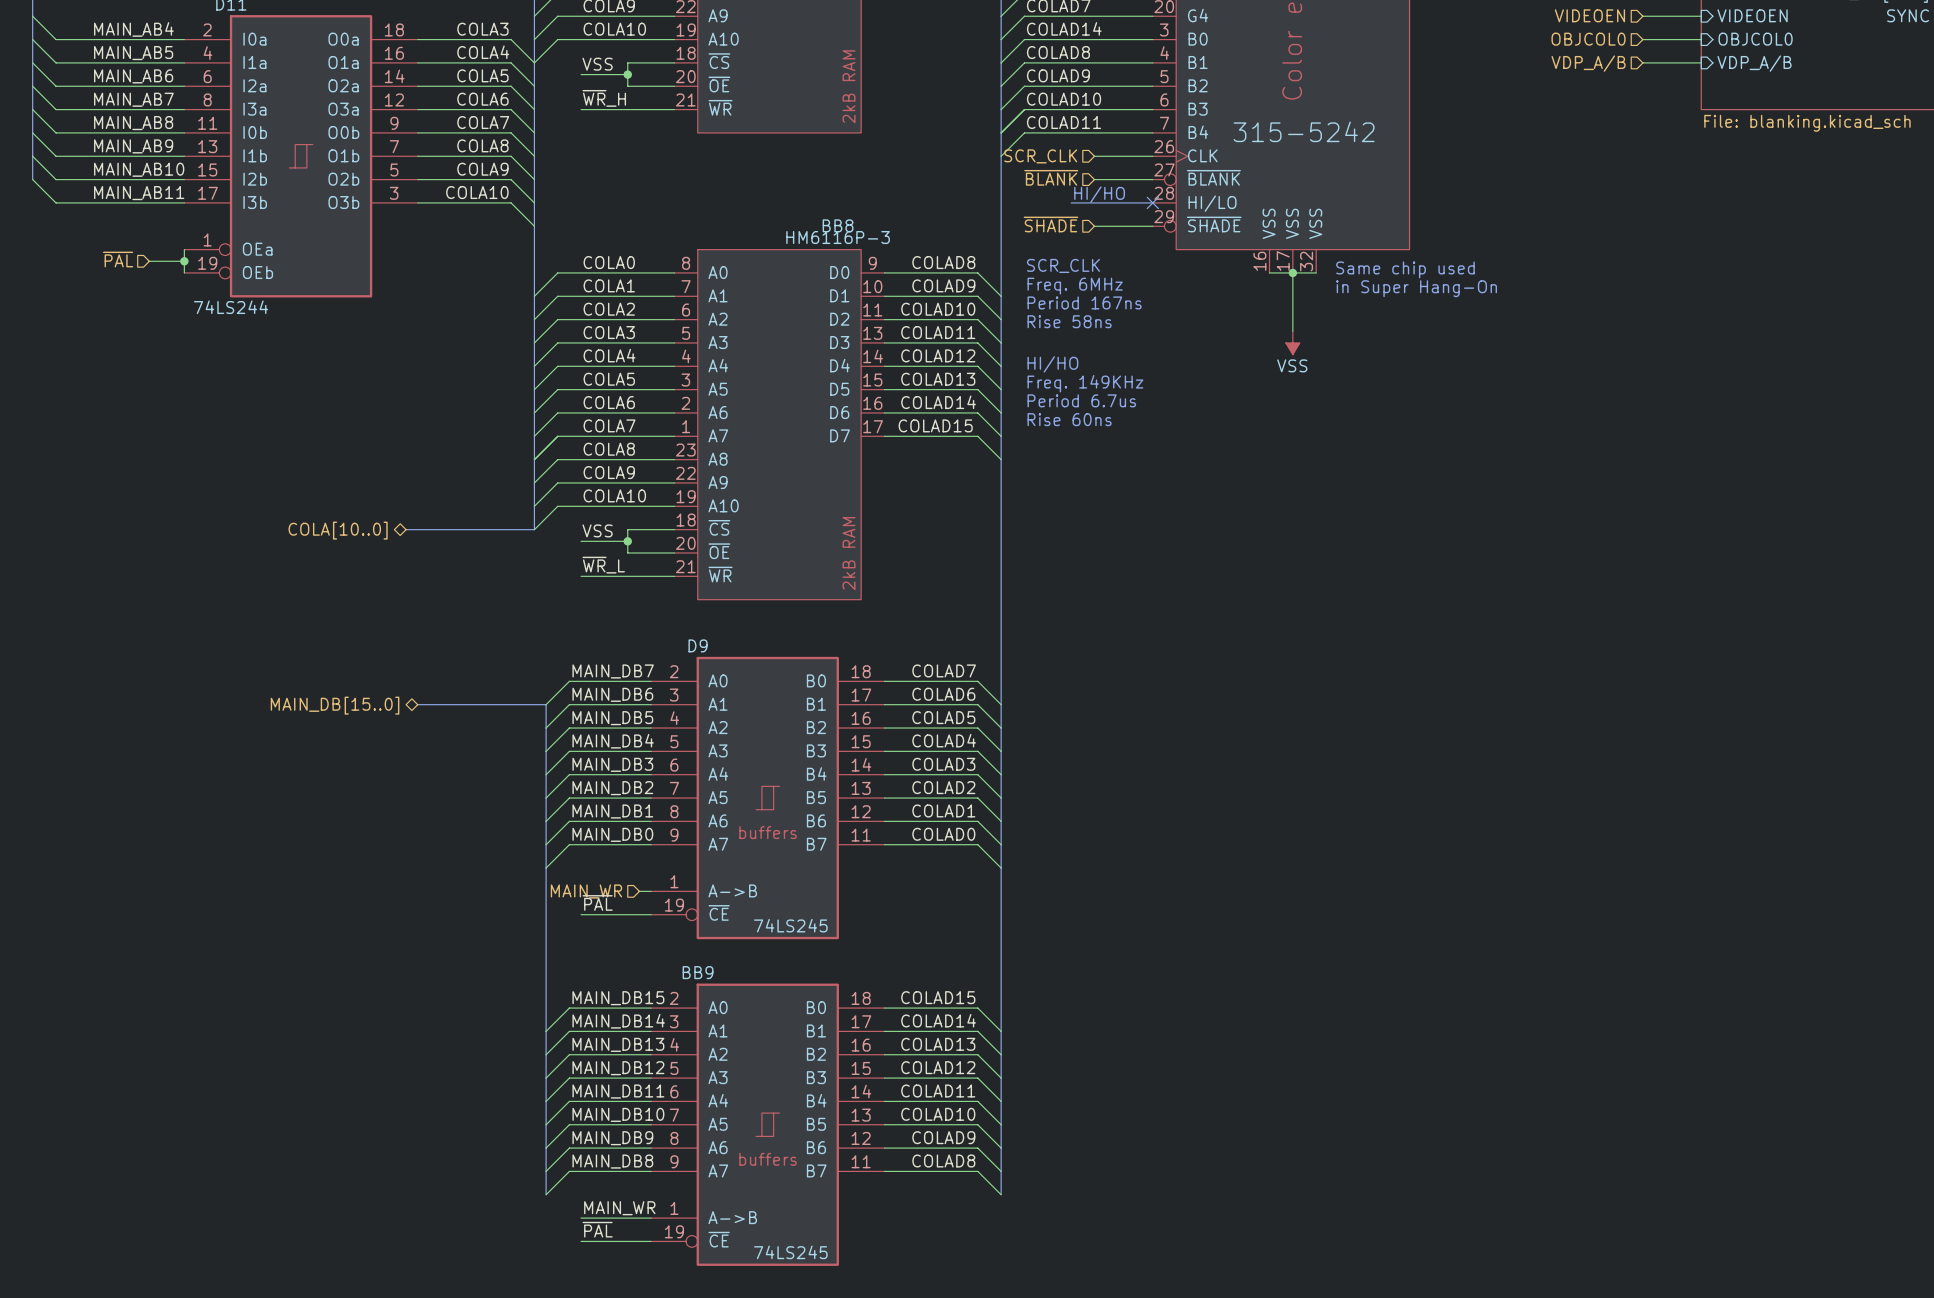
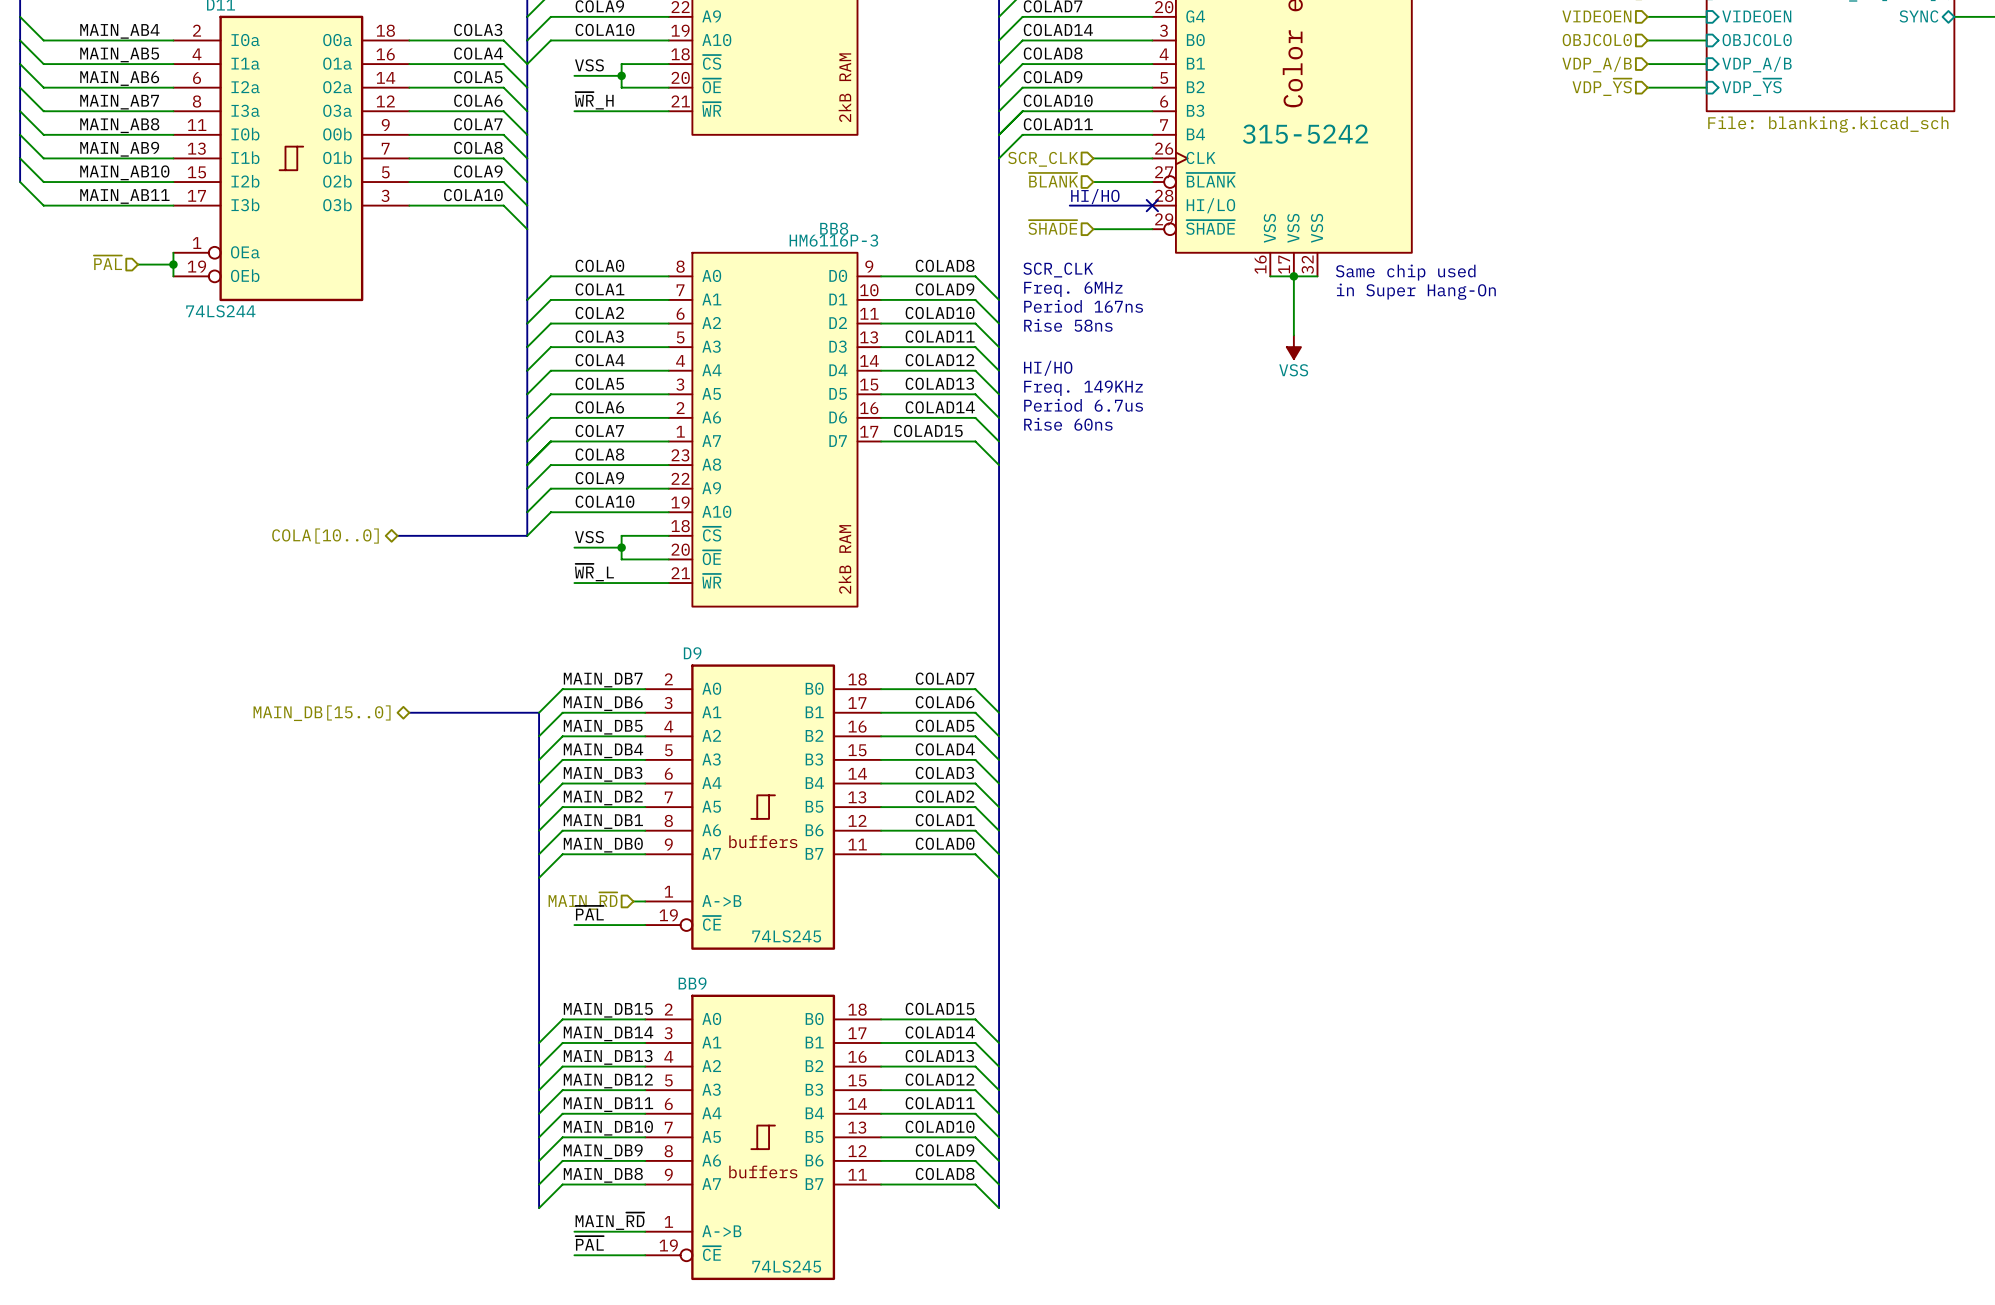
hierarchical label: none -> VDP_~{YS} (1602, 87)
sheet pin: none -> VDP_~{YS} (1751, 87)
wire: none -> (1647, 87) (1706, 87)
hierarchical label: MAIN_WR (586, 891) -> MAIN_~{RD} (583, 901)
label: MAIN_WR (619, 1208) -> MAIN_~{RD} (610, 1221)

